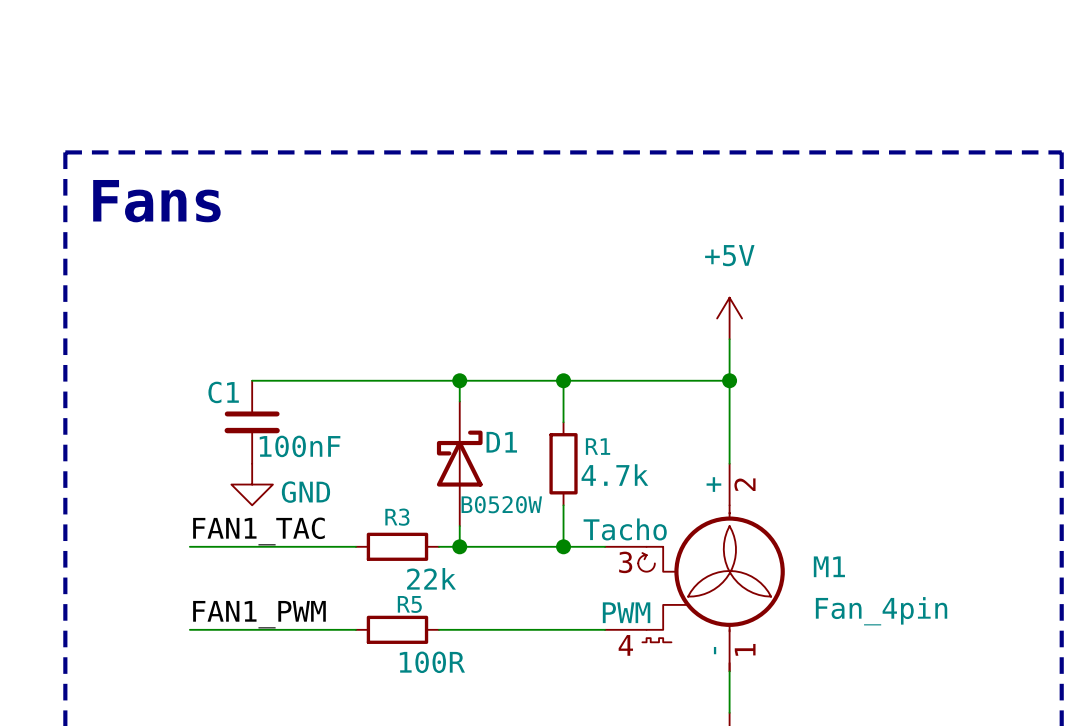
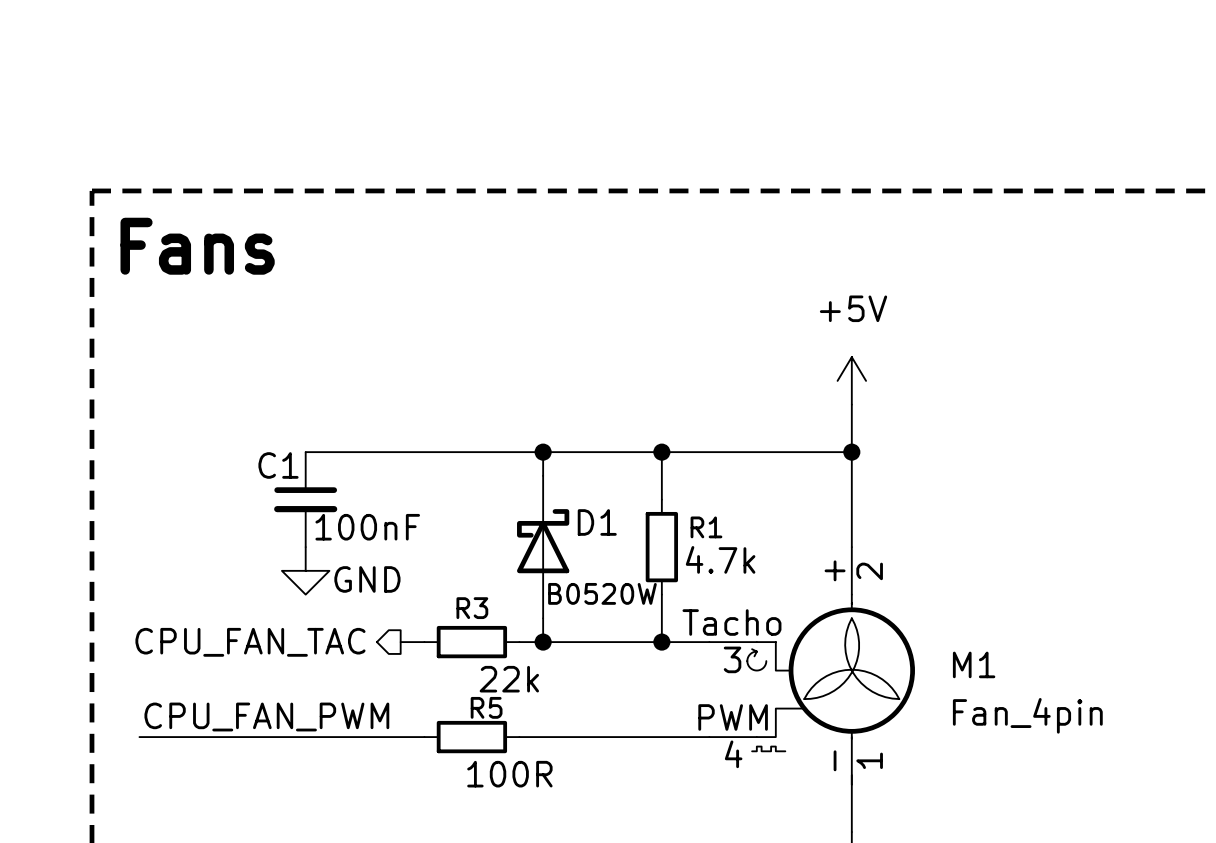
label: FAN1_TAC (258, 531) -> none
wire: (189, 546) (335, 546) -> none
hierarchical label: none -> CPU_FAN_TAC (250, 642)
label: FAN1_PWM (259, 614) -> CPU_FAN_PWM (266, 717)
wire: none -> (139, 737) (234, 737)

